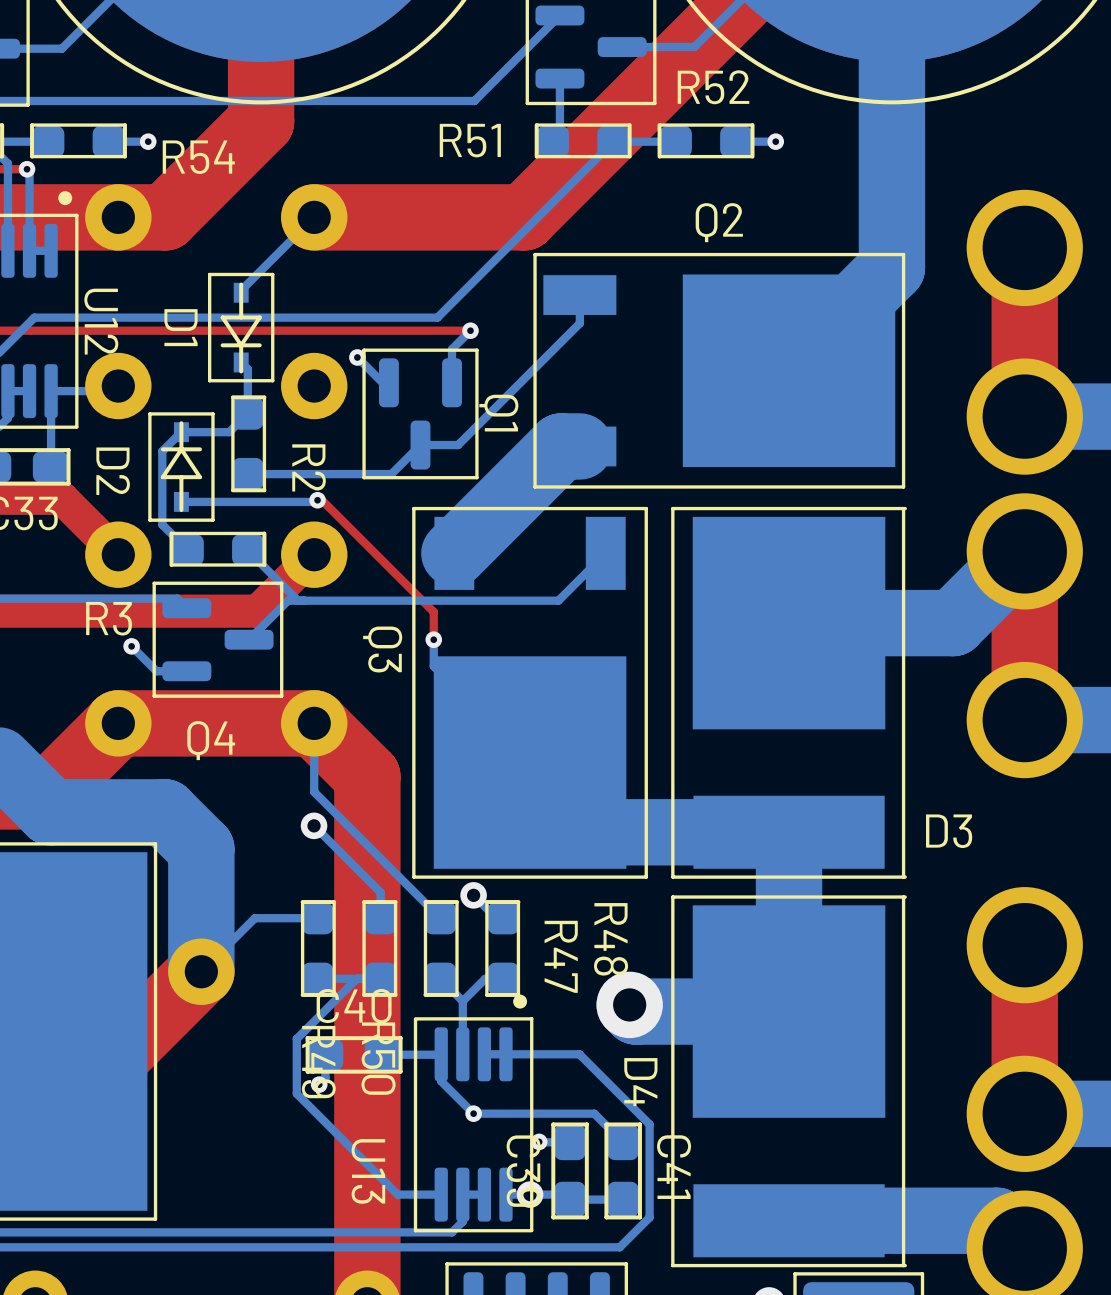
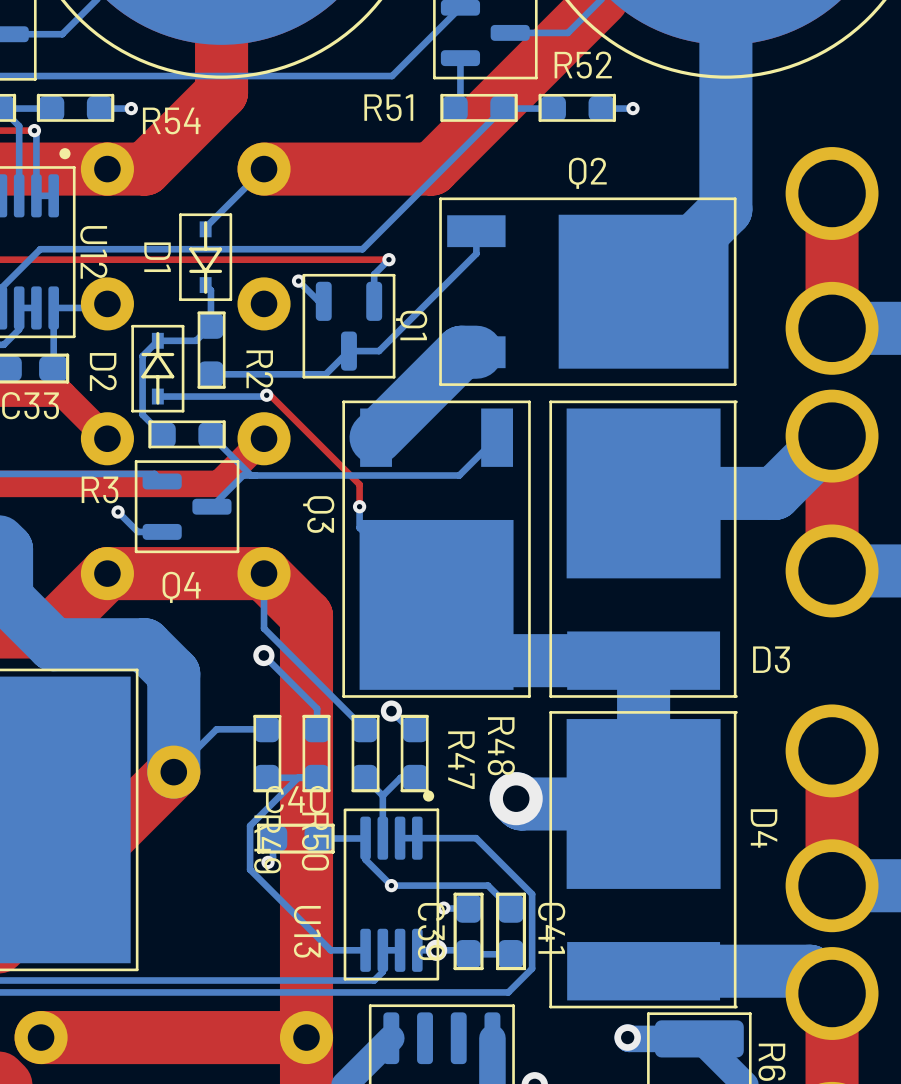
D4 name position: D4 (640, 1082) -> D4 (764, 828)

